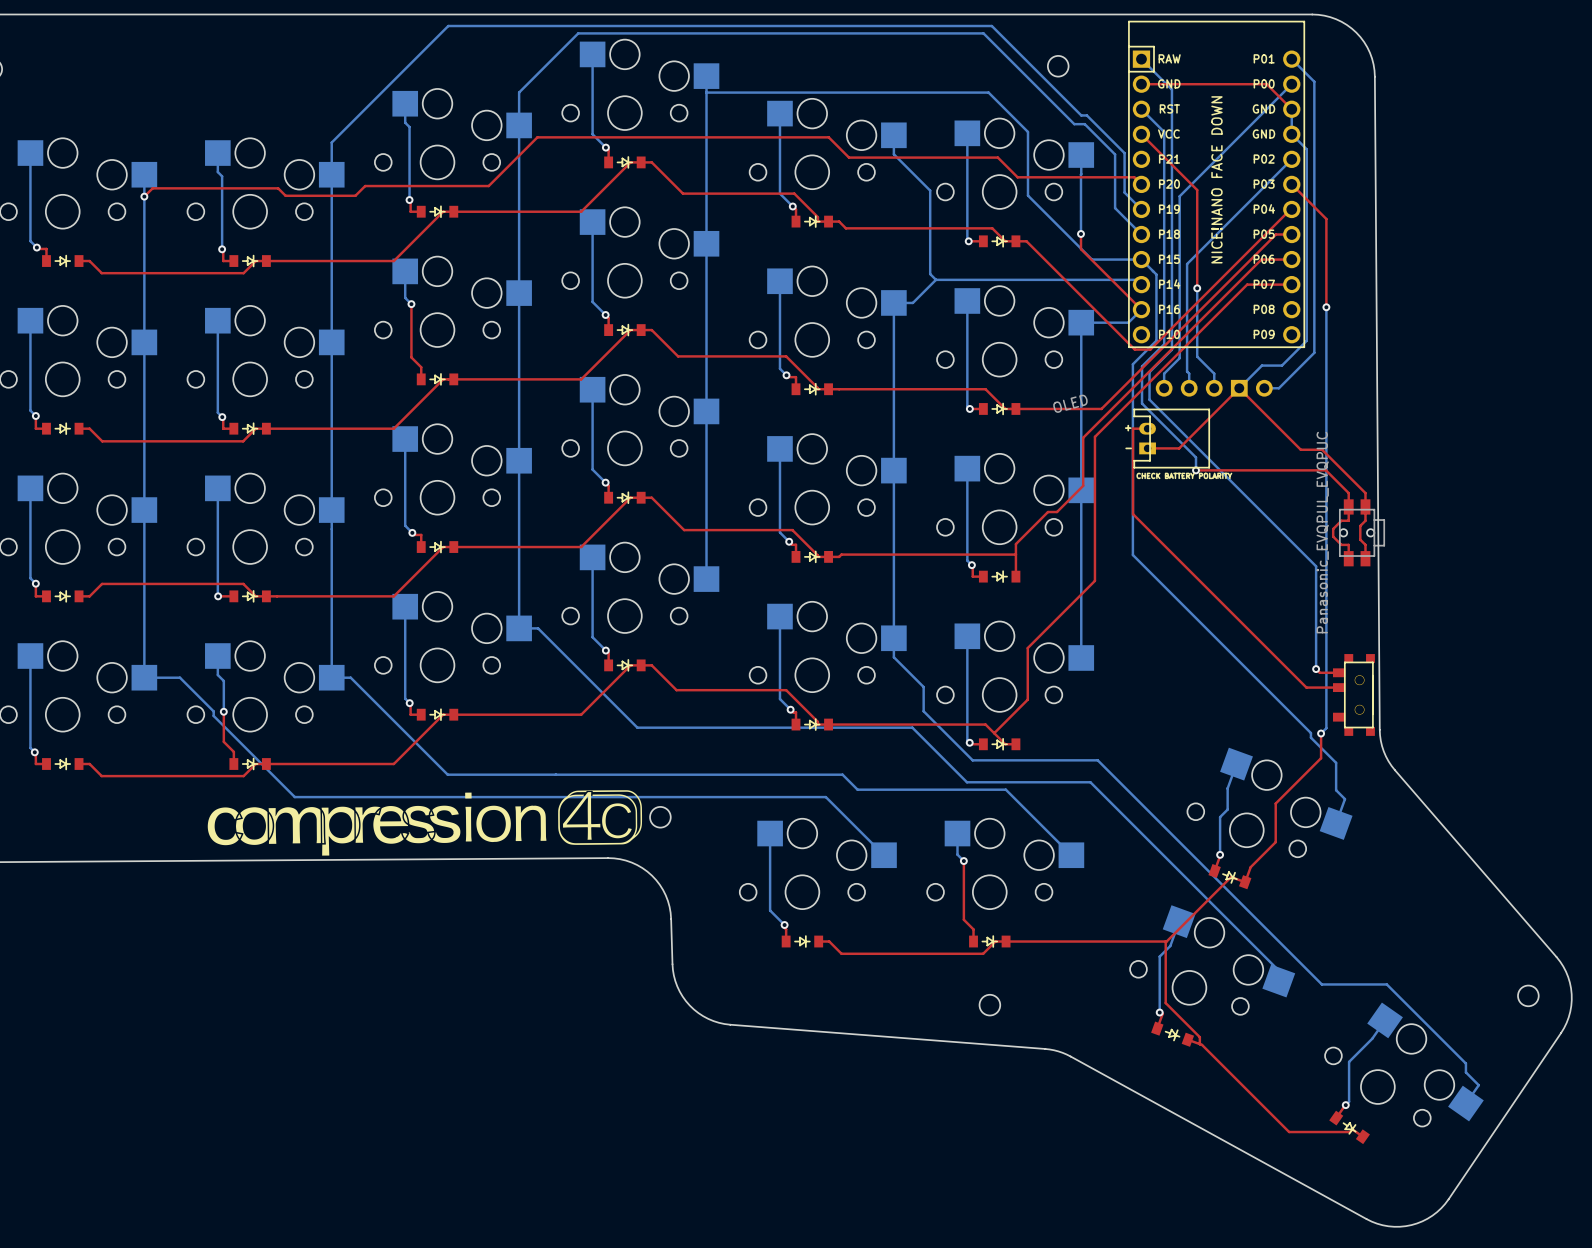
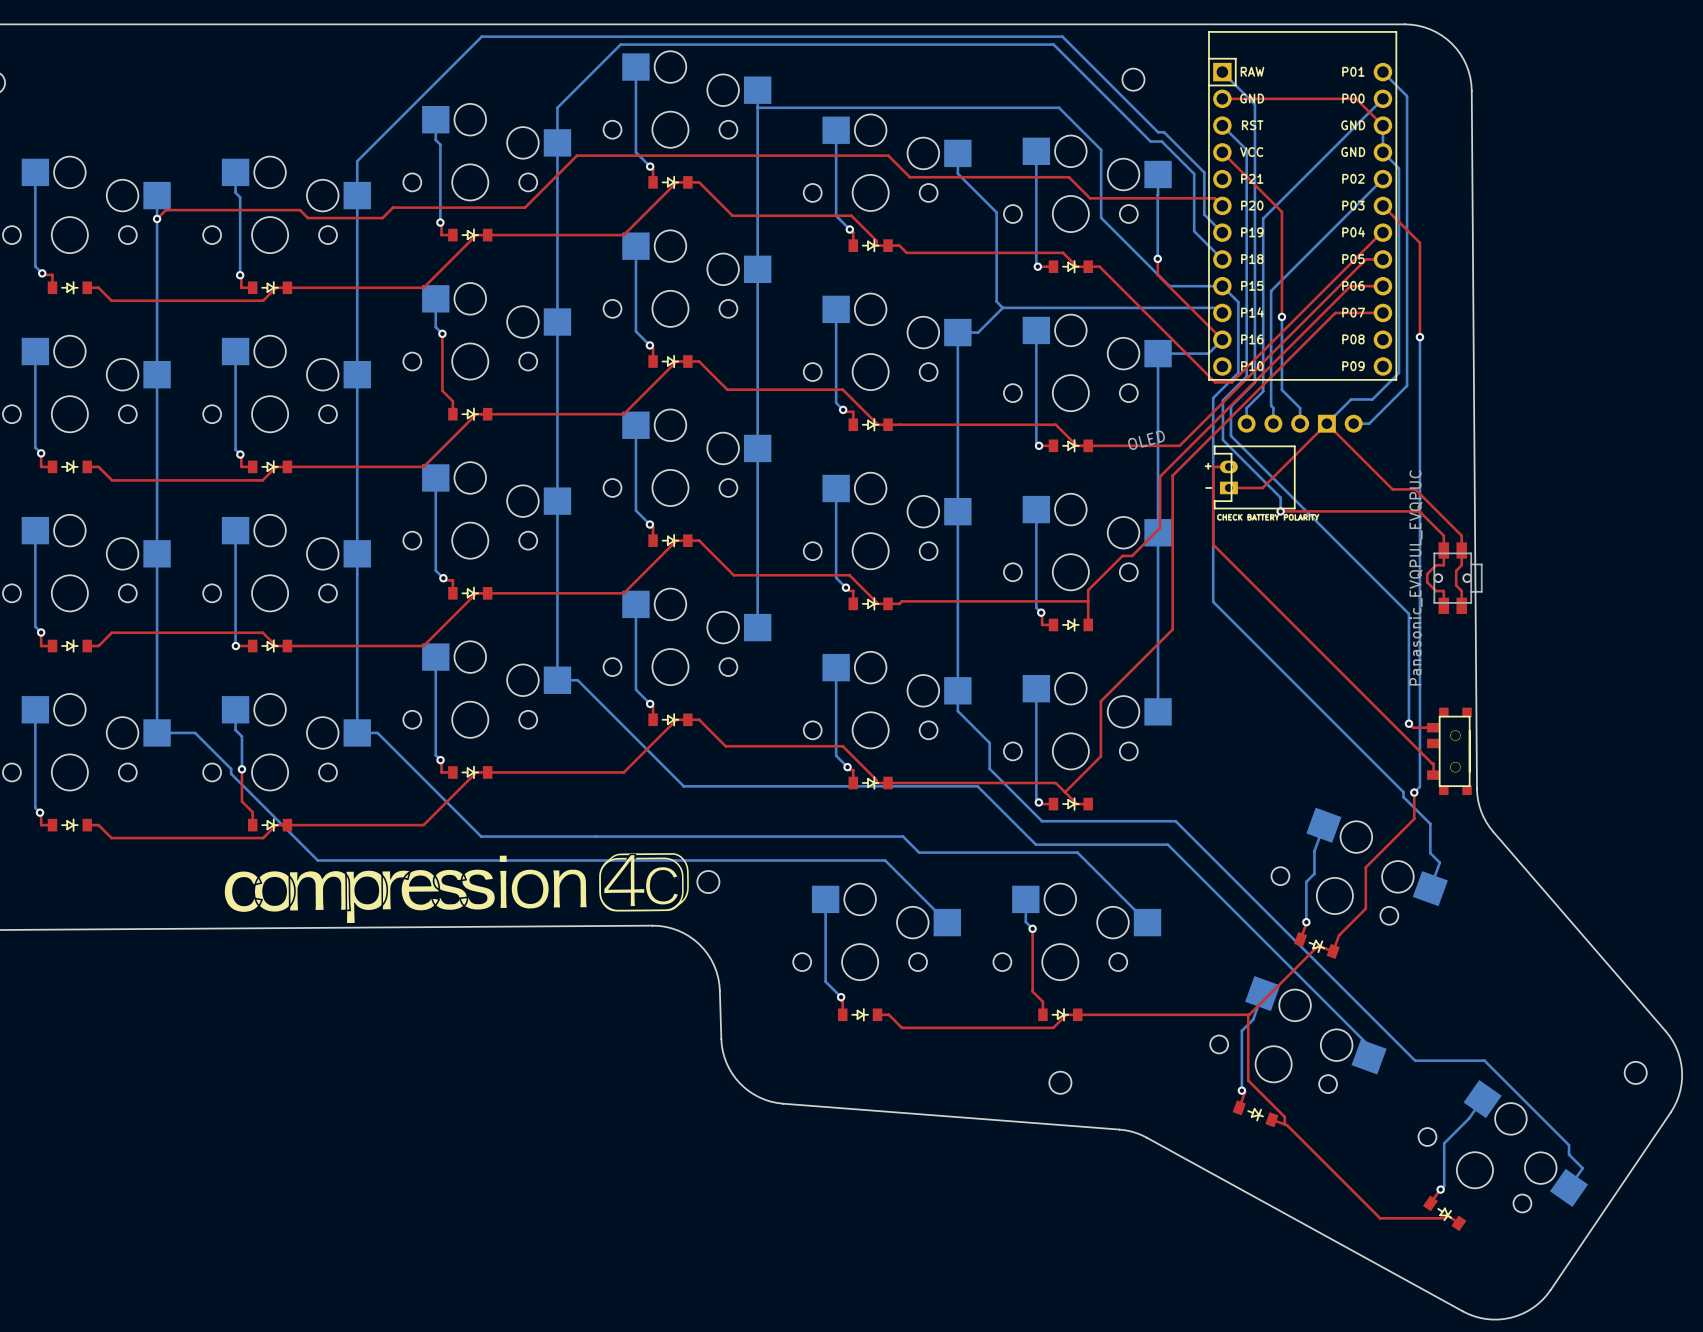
text: NICE!NANO FACE DOWN (1216, 179) -> none
top track: (1133, 501) (1133, 514) (1306, 687) (1334, 687) -> (1213, 544) (1433, 763) (1433, 775)

